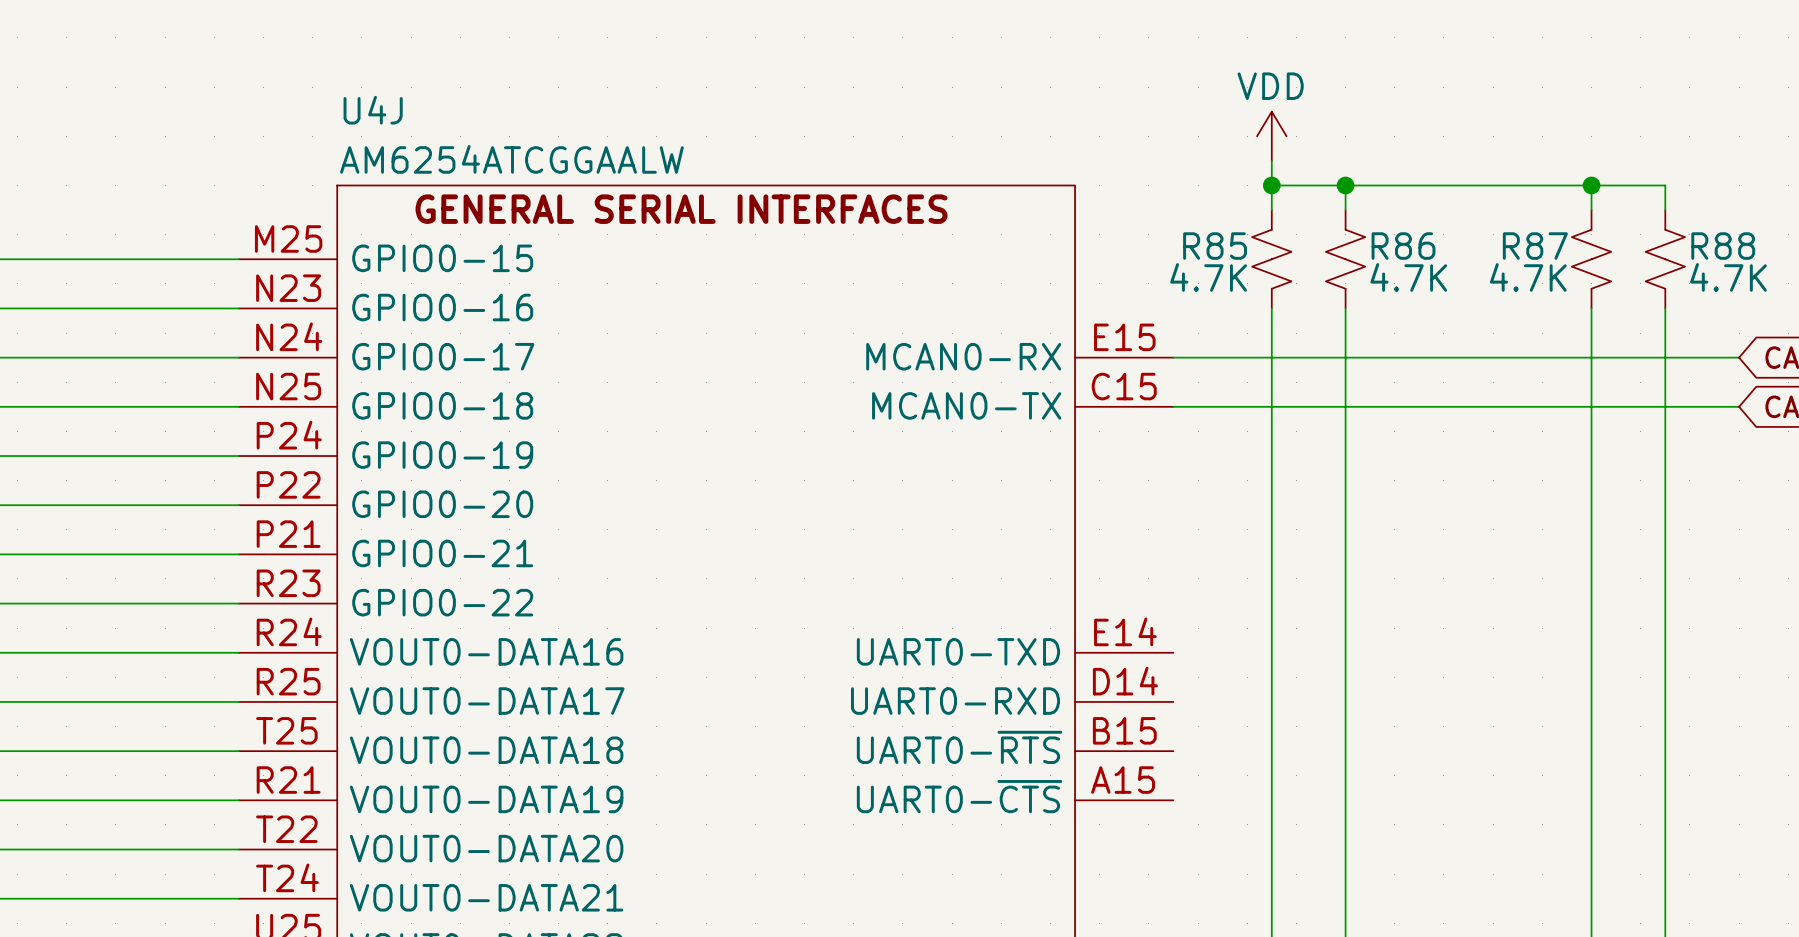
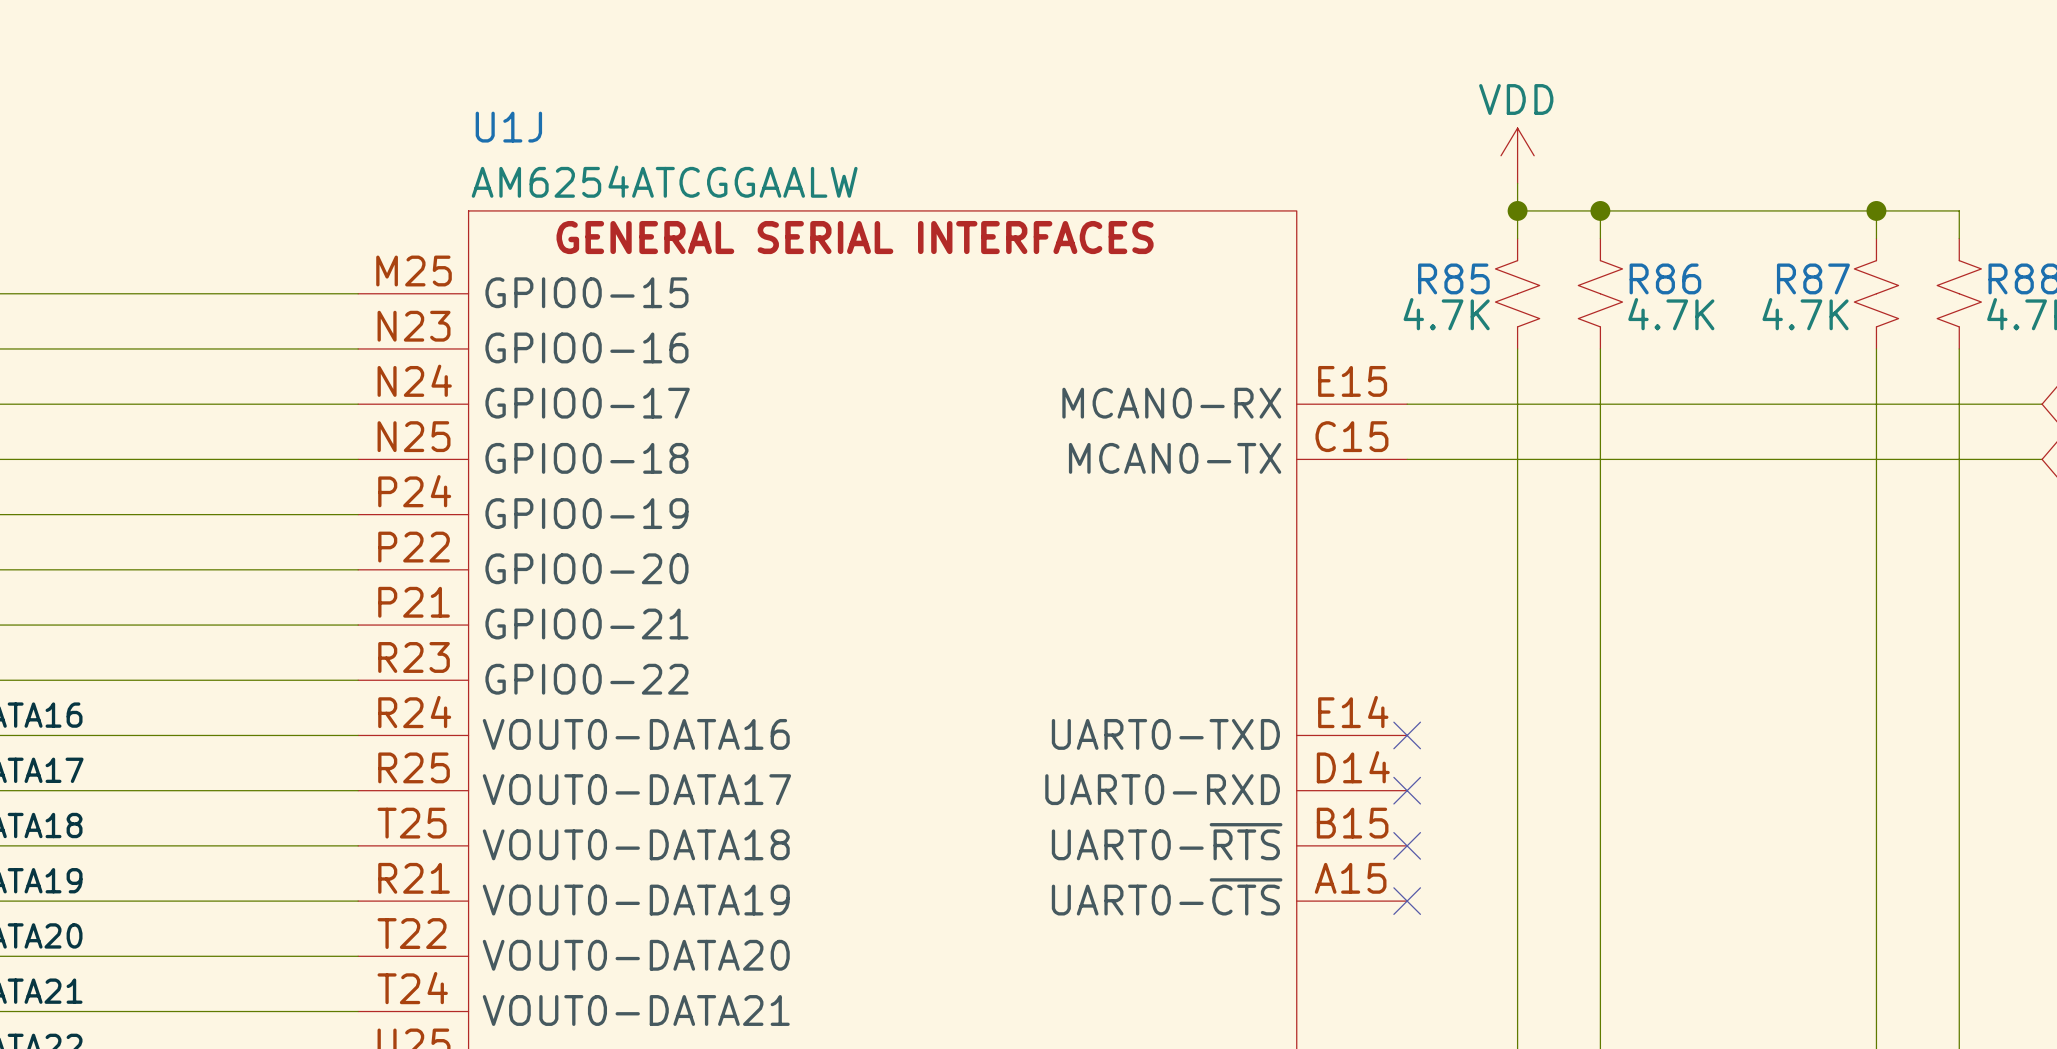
U4J name: U4J (373, 110) -> U1J (508, 127)
no-connect mark: none -> (1407, 735)
no-connect mark: none -> (1407, 790)
no-connect mark: none -> (1407, 845)
no-connect mark: none -> (1407, 901)

